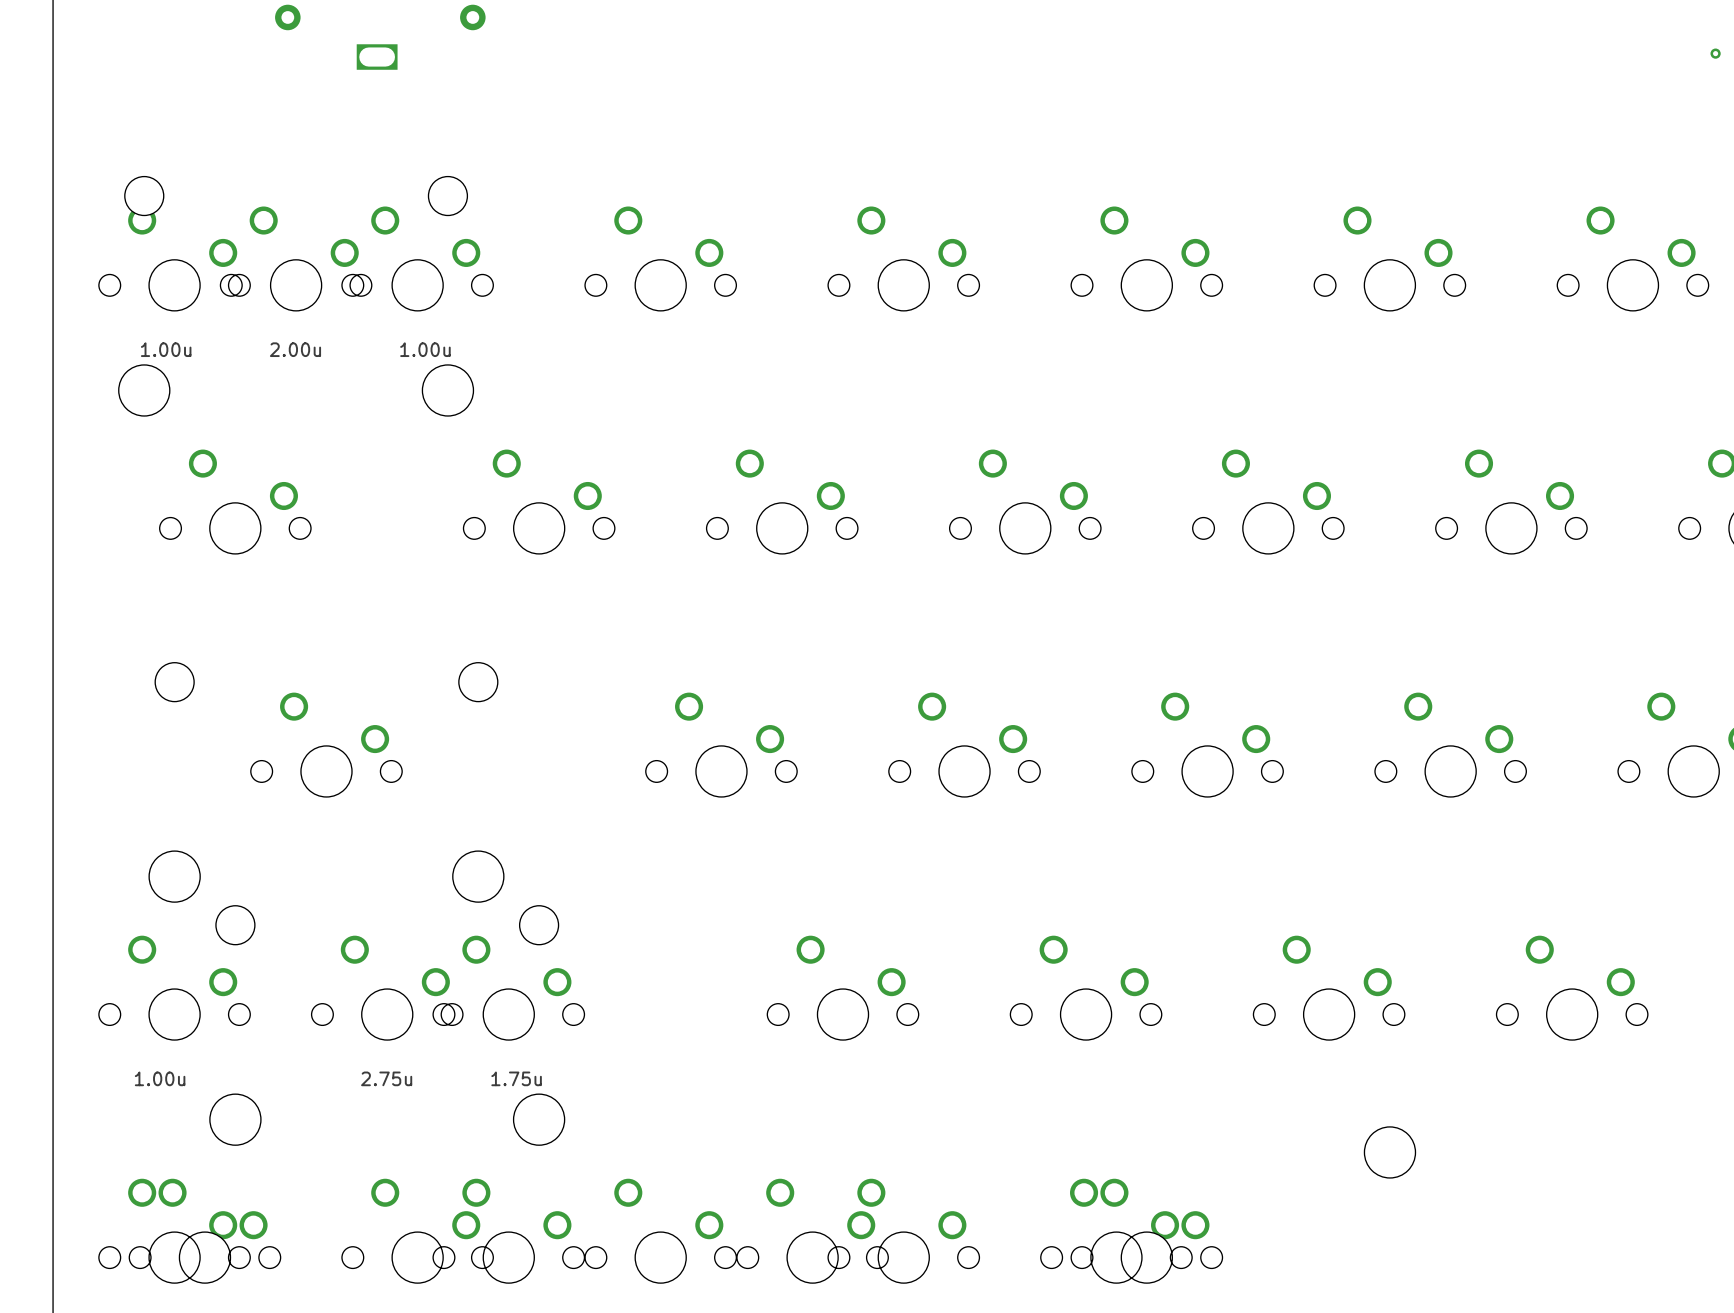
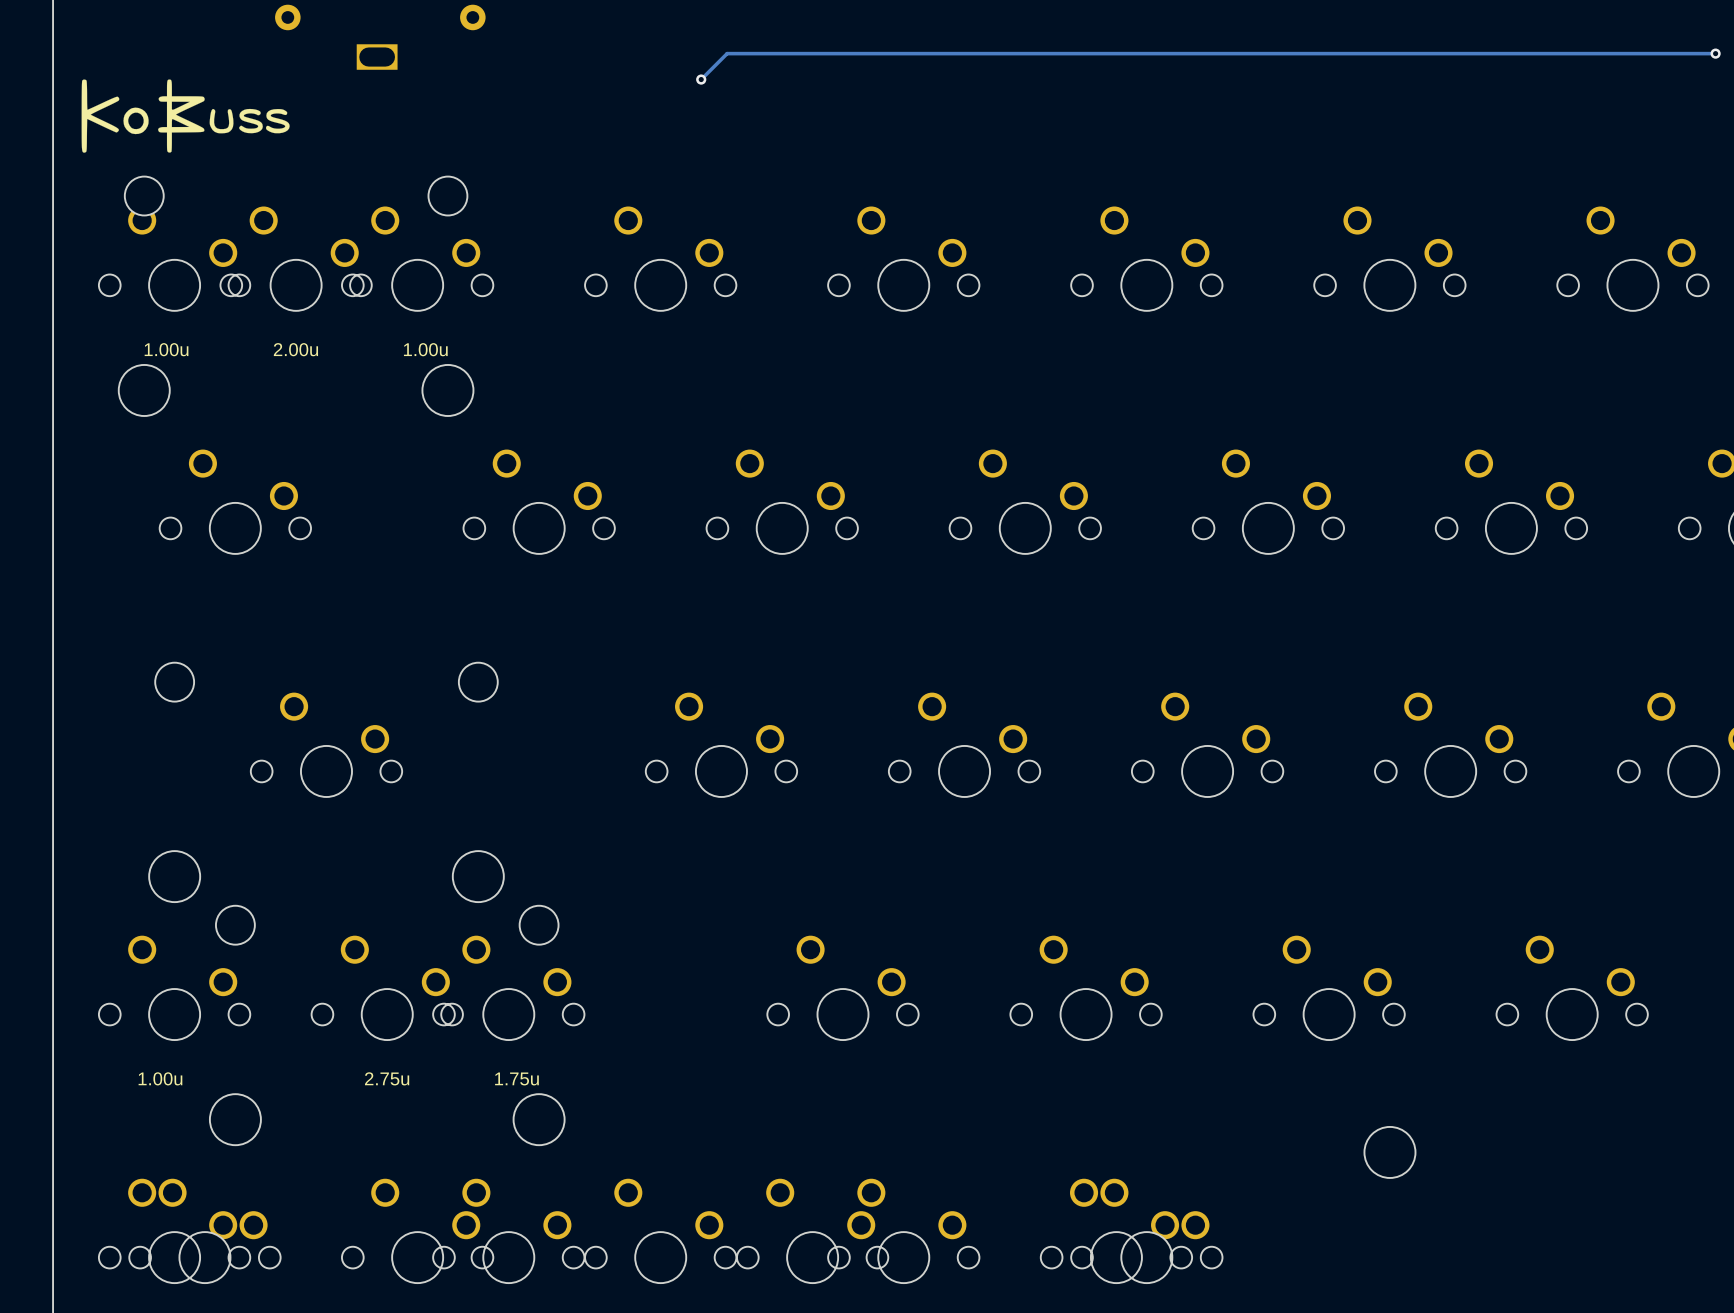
track: none -> (1715, 53) (727, 53) (701, 79)
drawing: none -> [81, 79, 290, 153]
via: none -> (701, 79)

